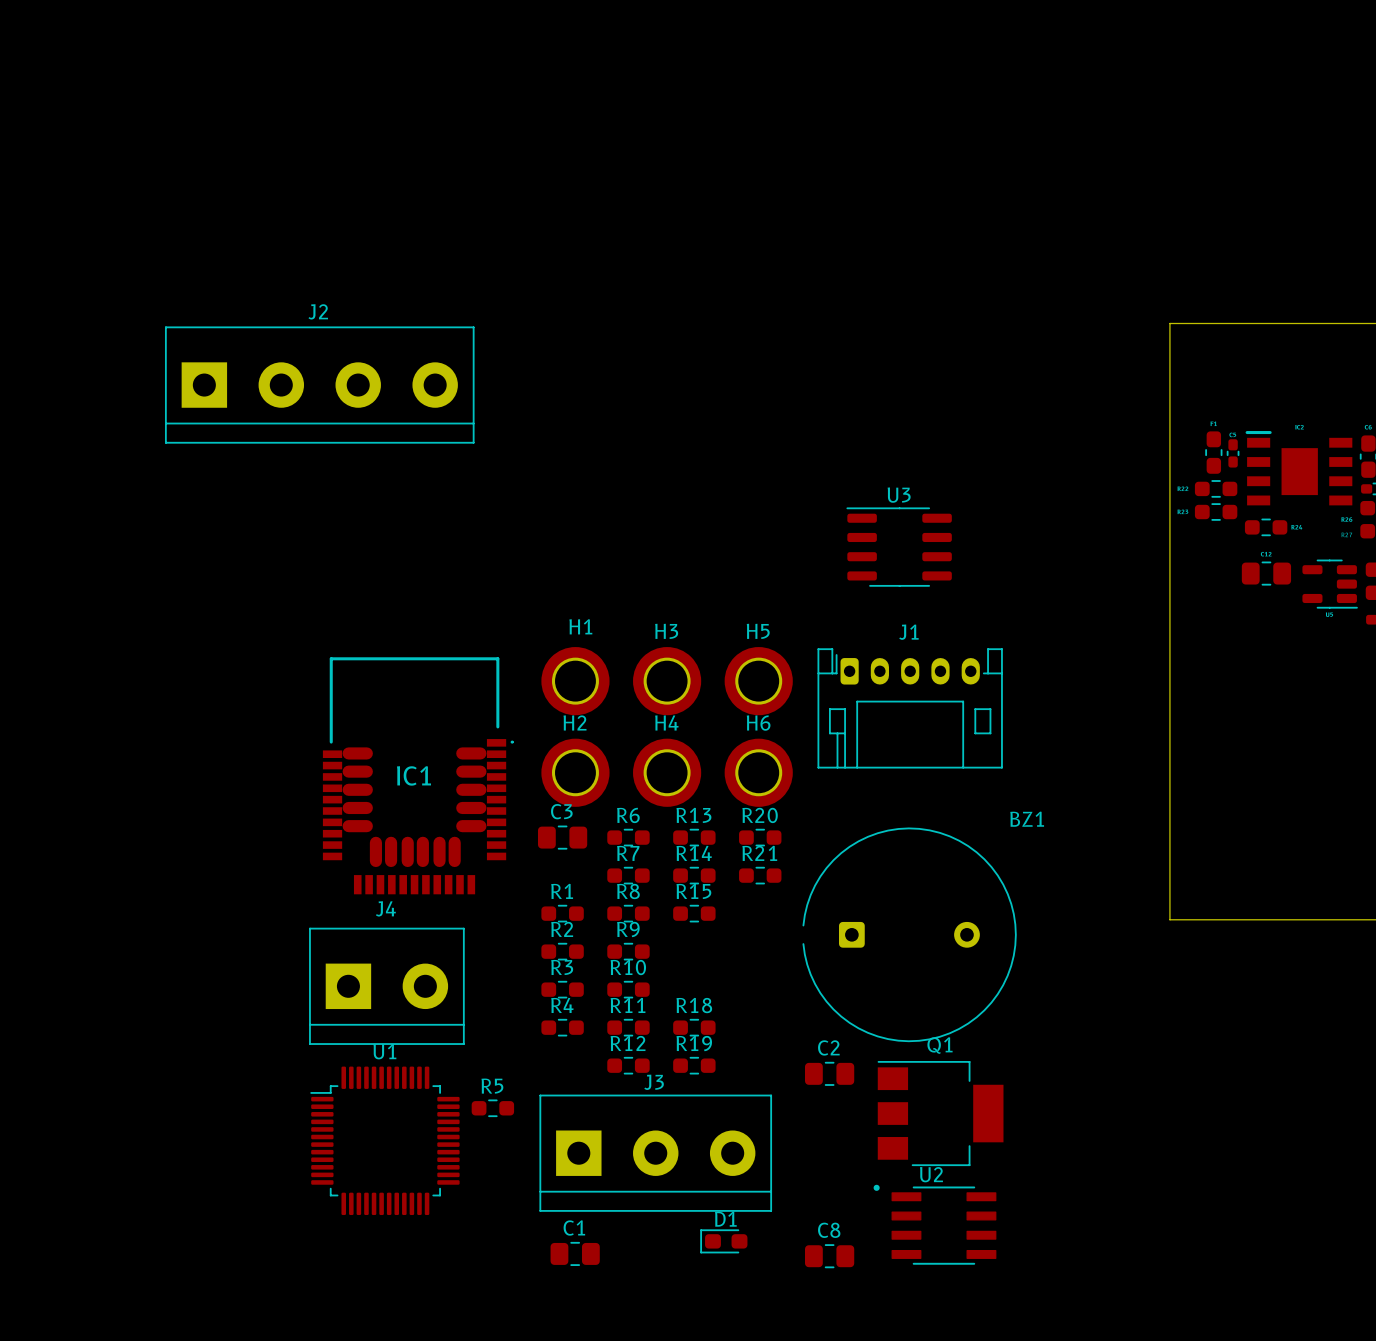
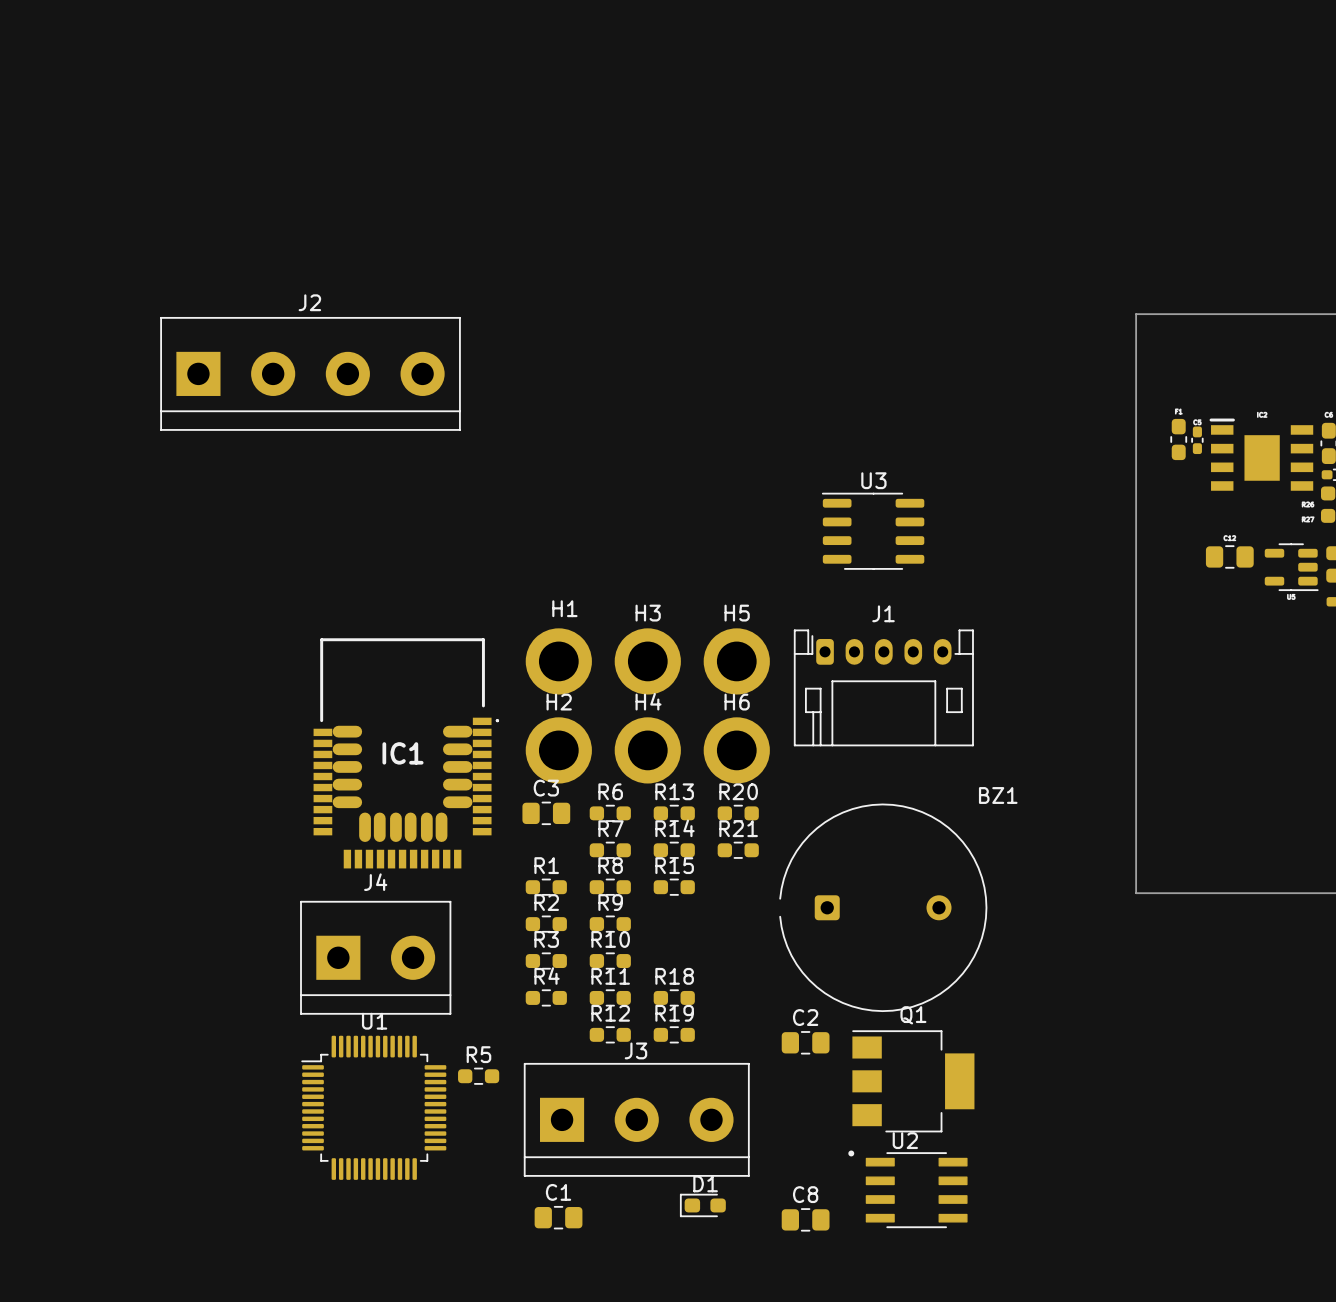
part: (1216, 488) -> none
part: (1216, 512) -> none
part: (1266, 527) -> none

